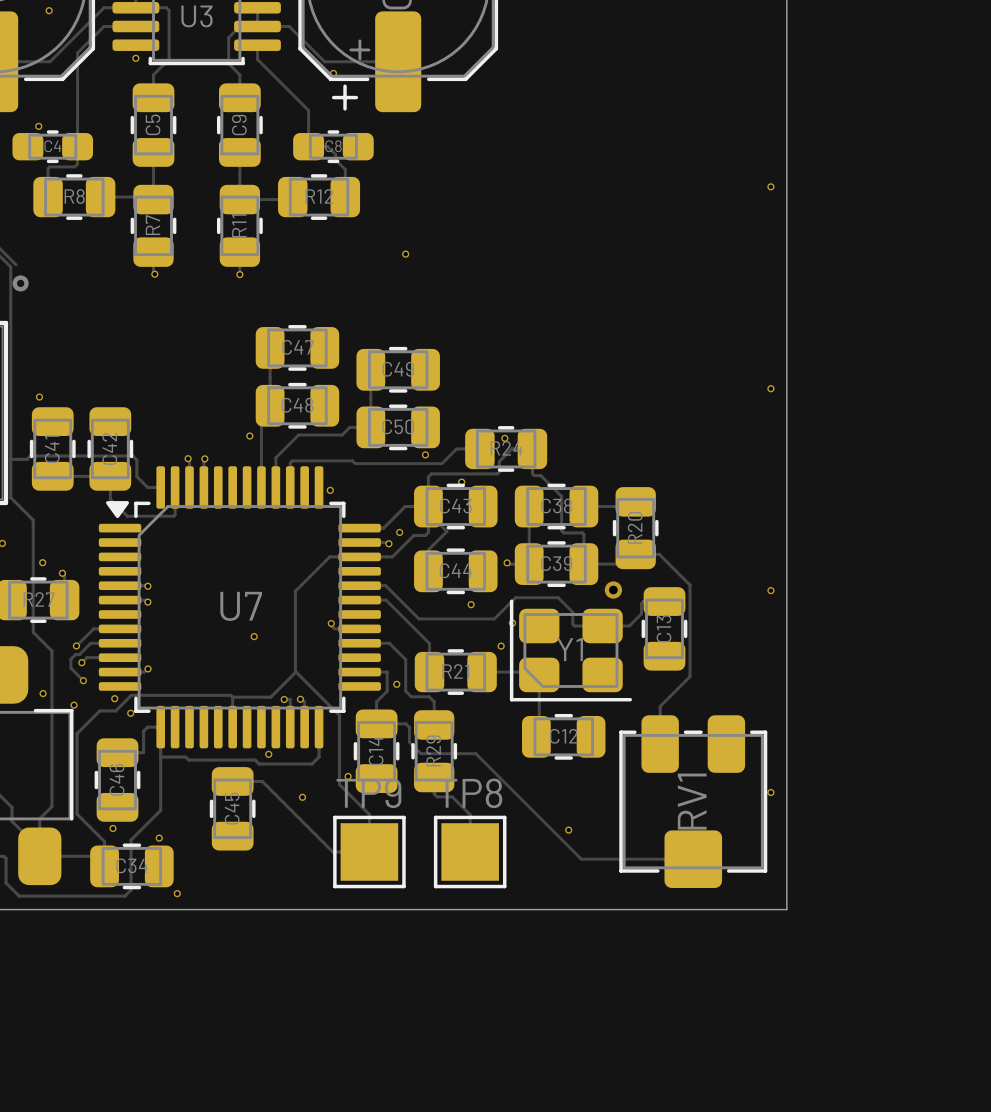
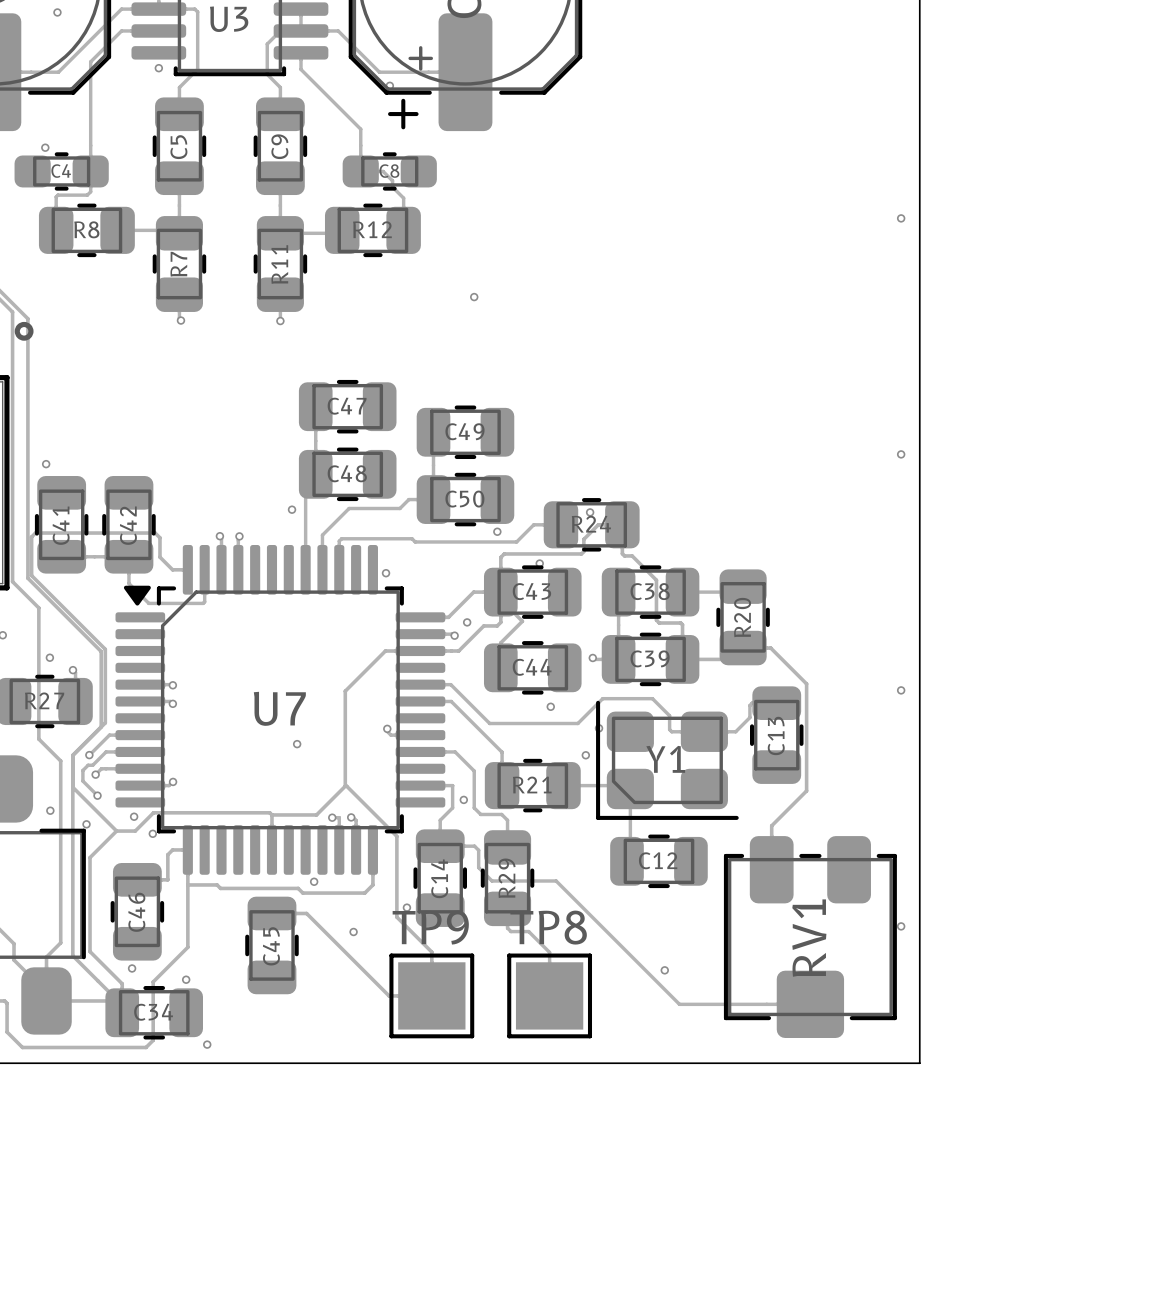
track: none -> (18, 309) (27, 318) (27, 578) (101, 651) (101, 726)
track: (11, 459) (27, 459) -> (122, 1005) (72, 955) (72, 755) (105, 722) (105, 649) (31, 575) (31, 536)
via: (613, 590) -> none
track: none -> (73, 755) (73, 787) (116, 831)

